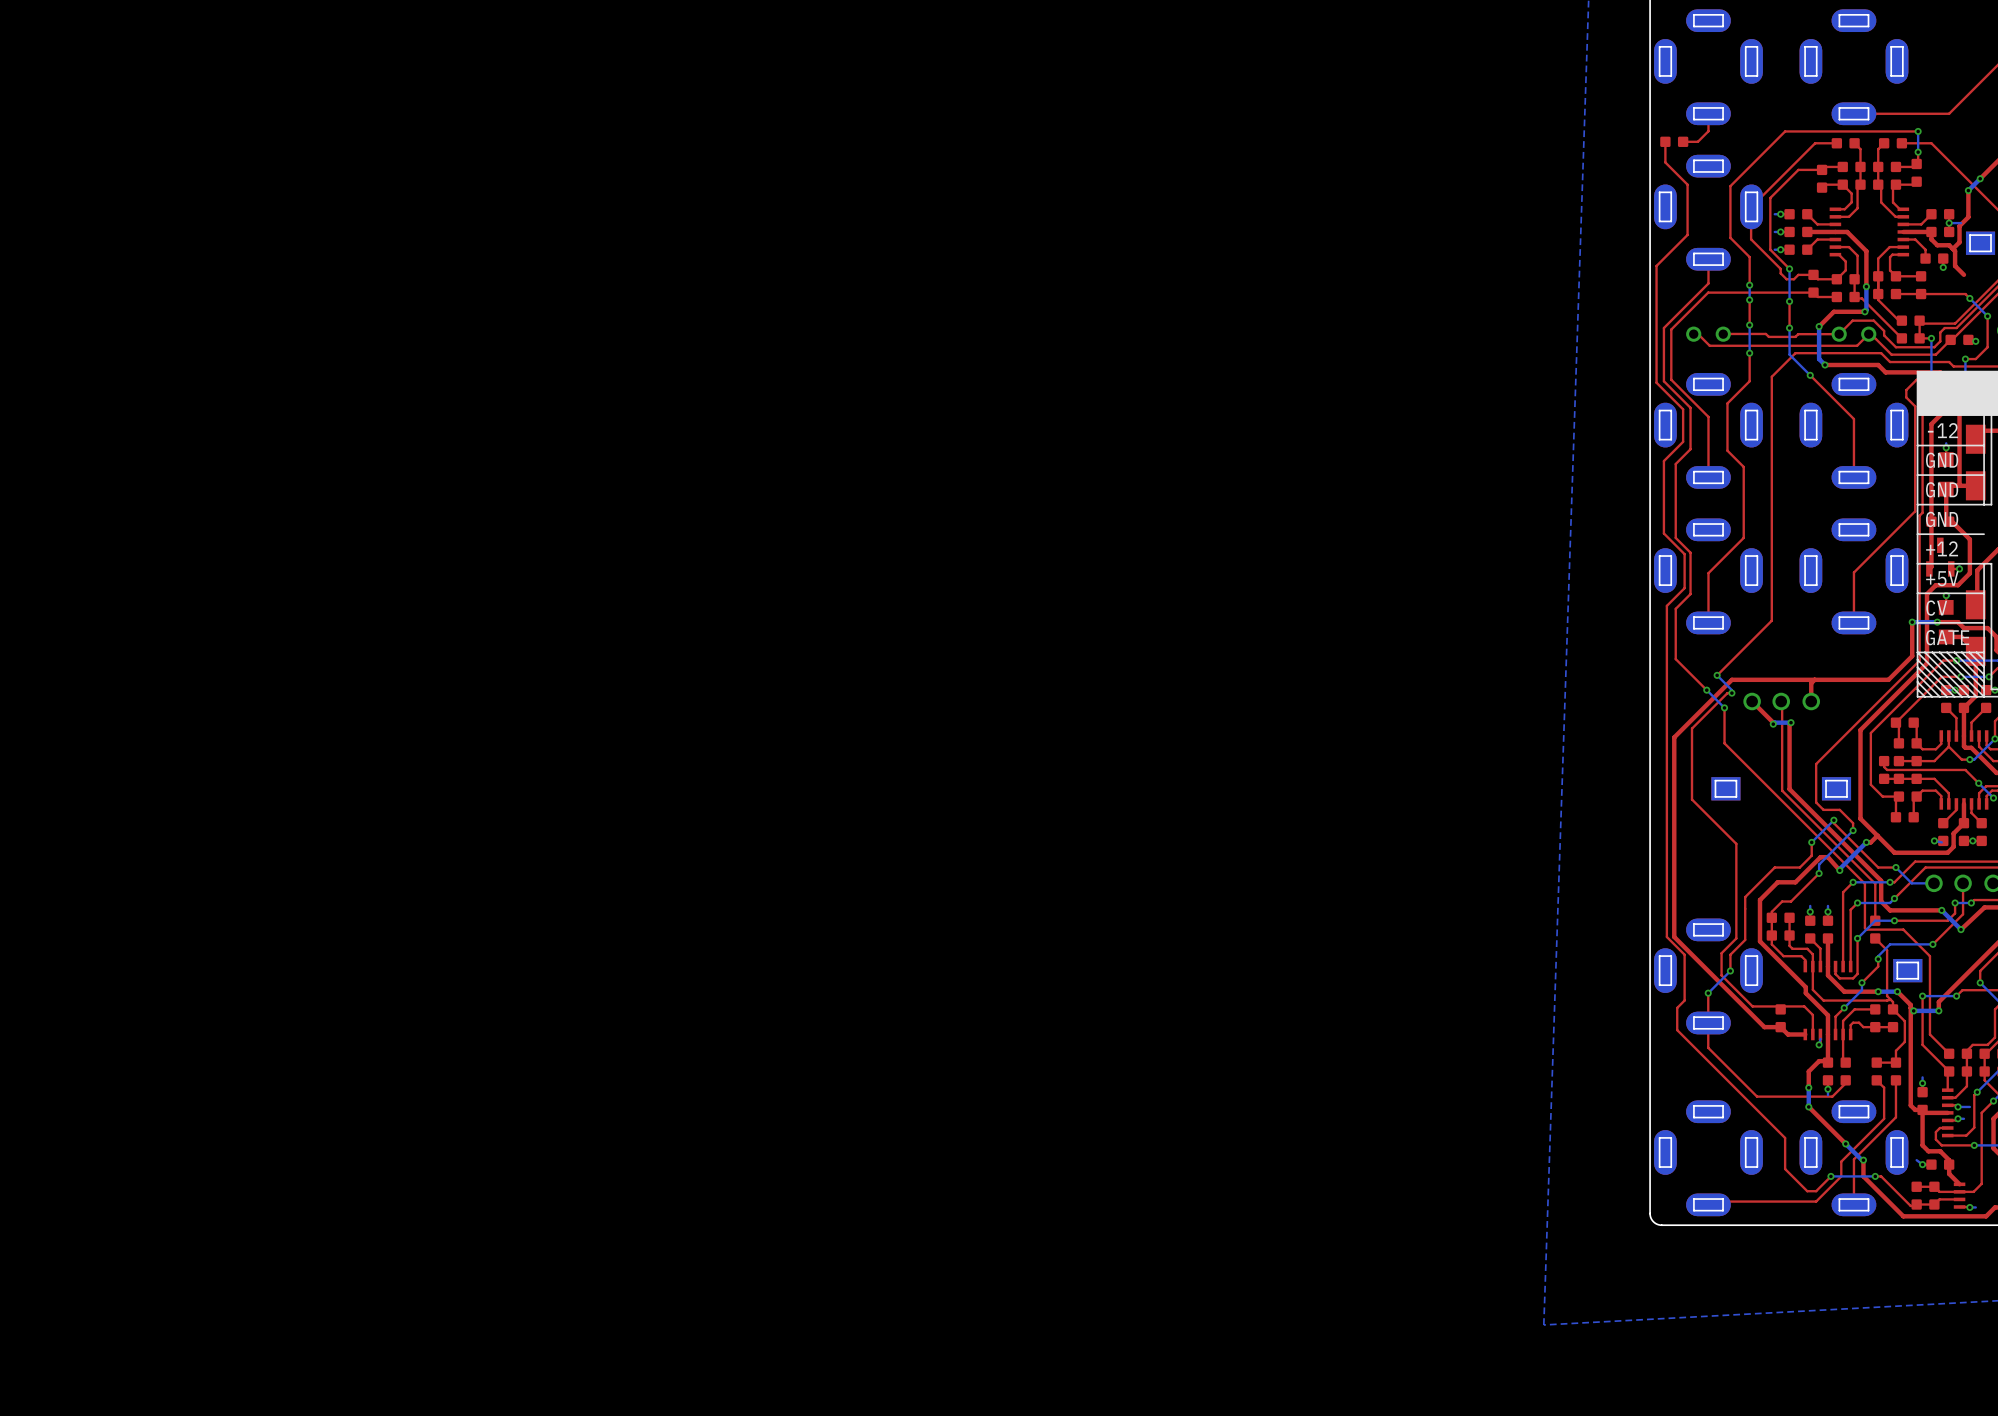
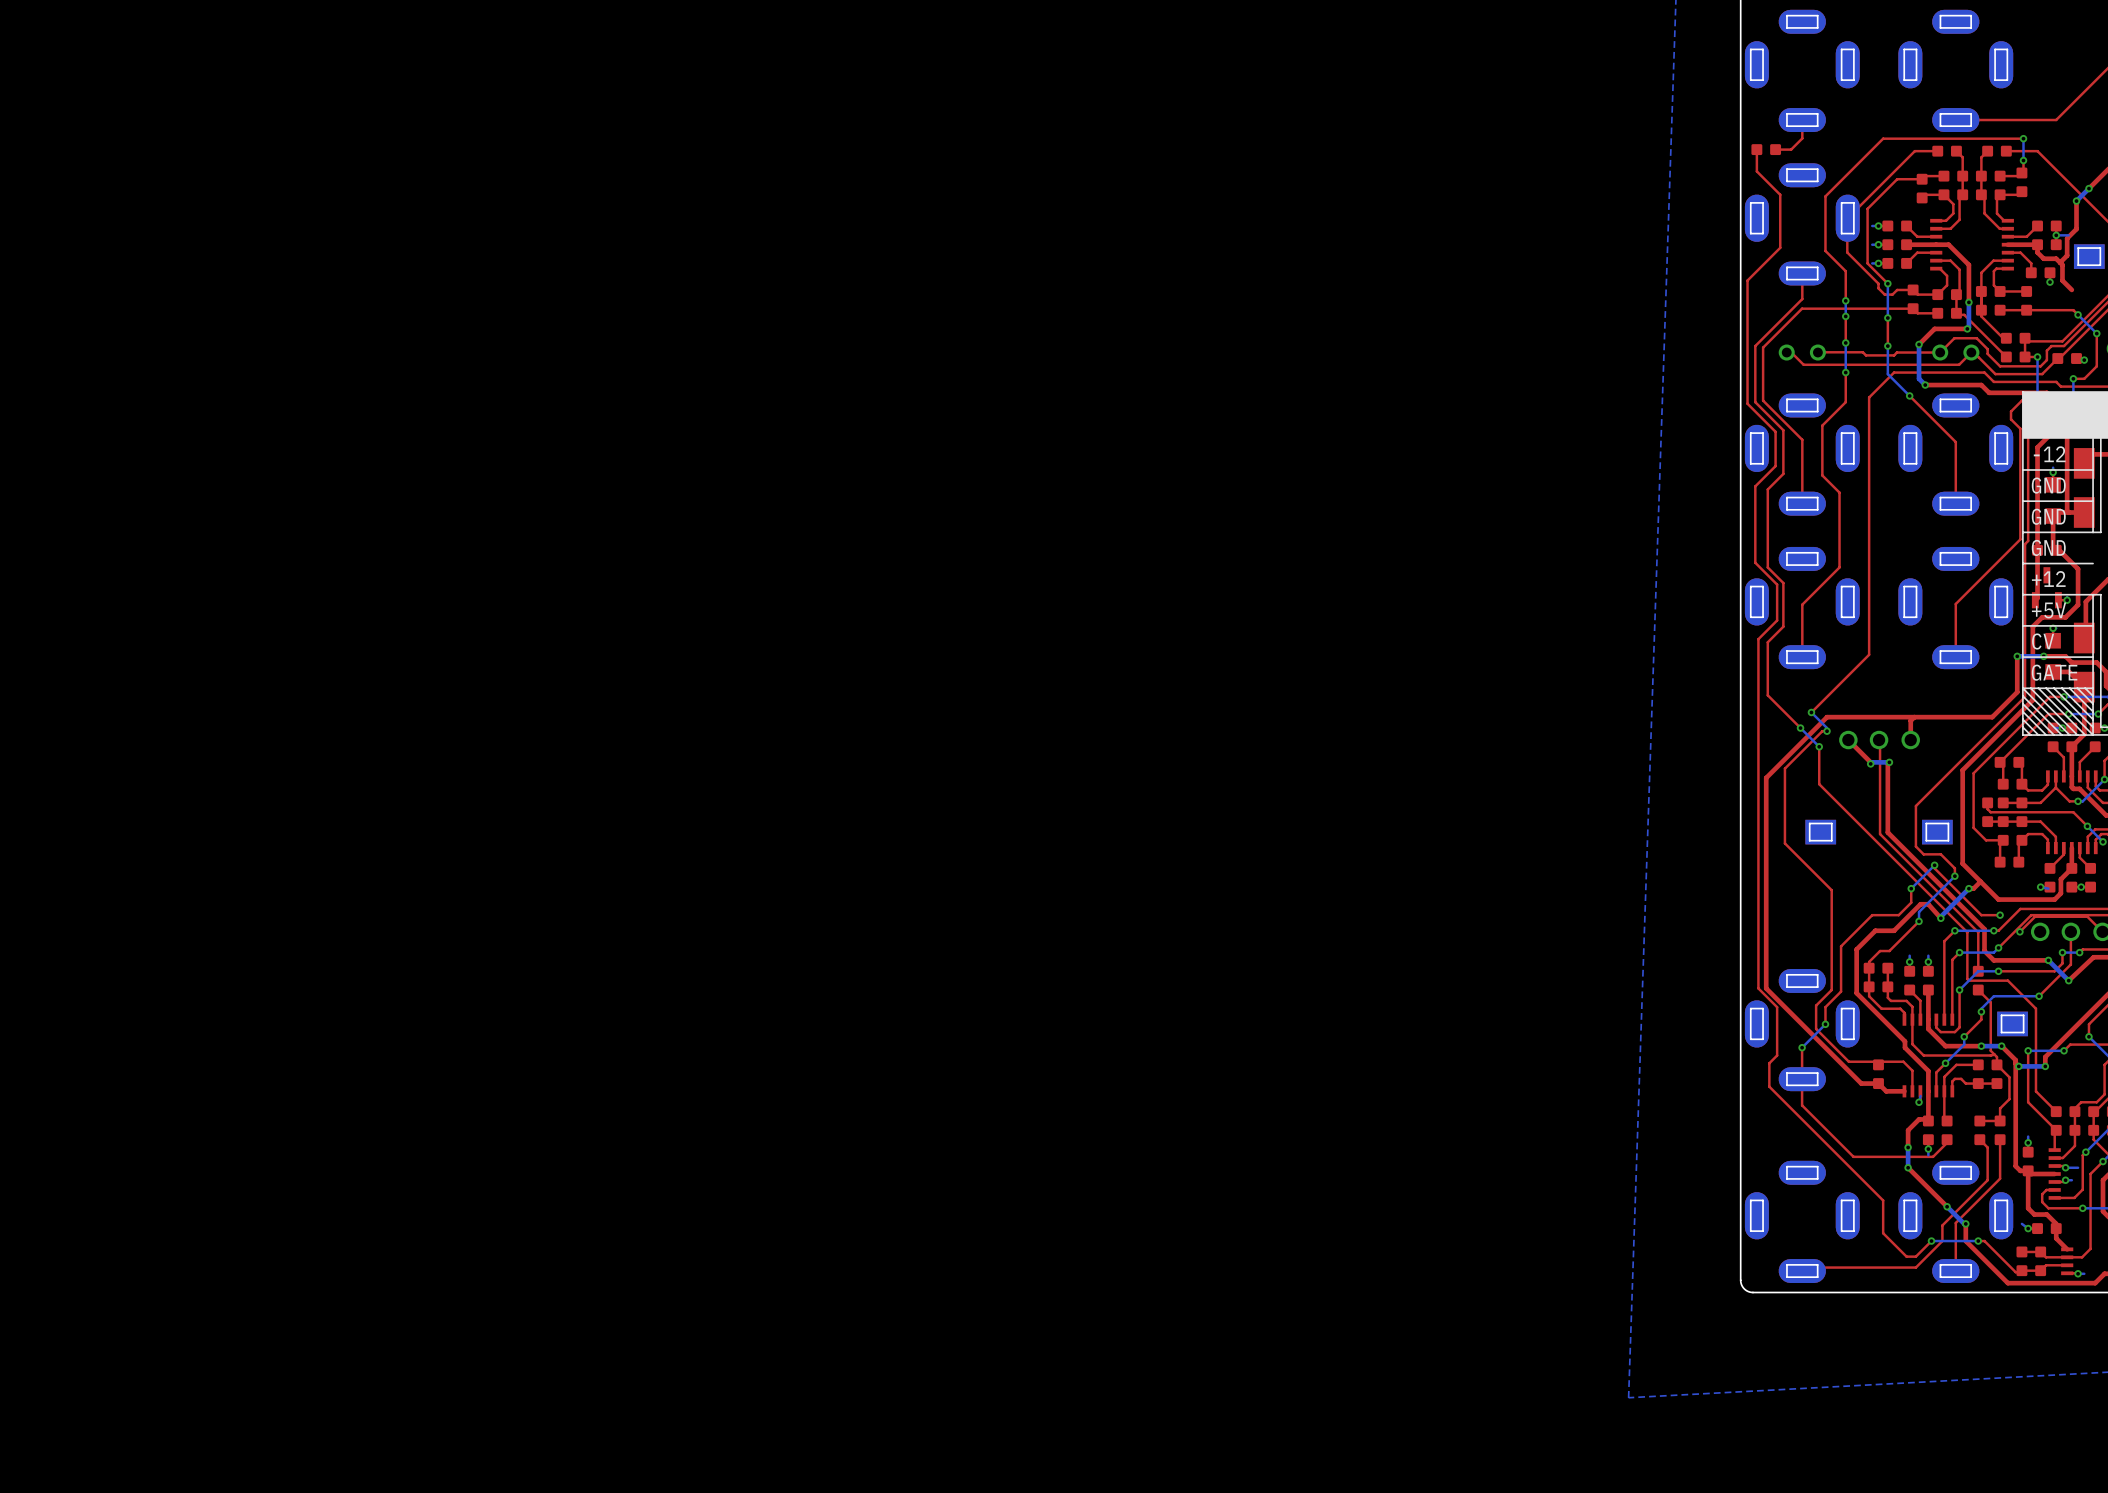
bottom track: (1895, 867) (1911, 883) (1933, 883) -> none
via: none -> (2019, 931)
top track: none -> (2102, 931) (2087, 916) (2035, 916) (2019, 931)

